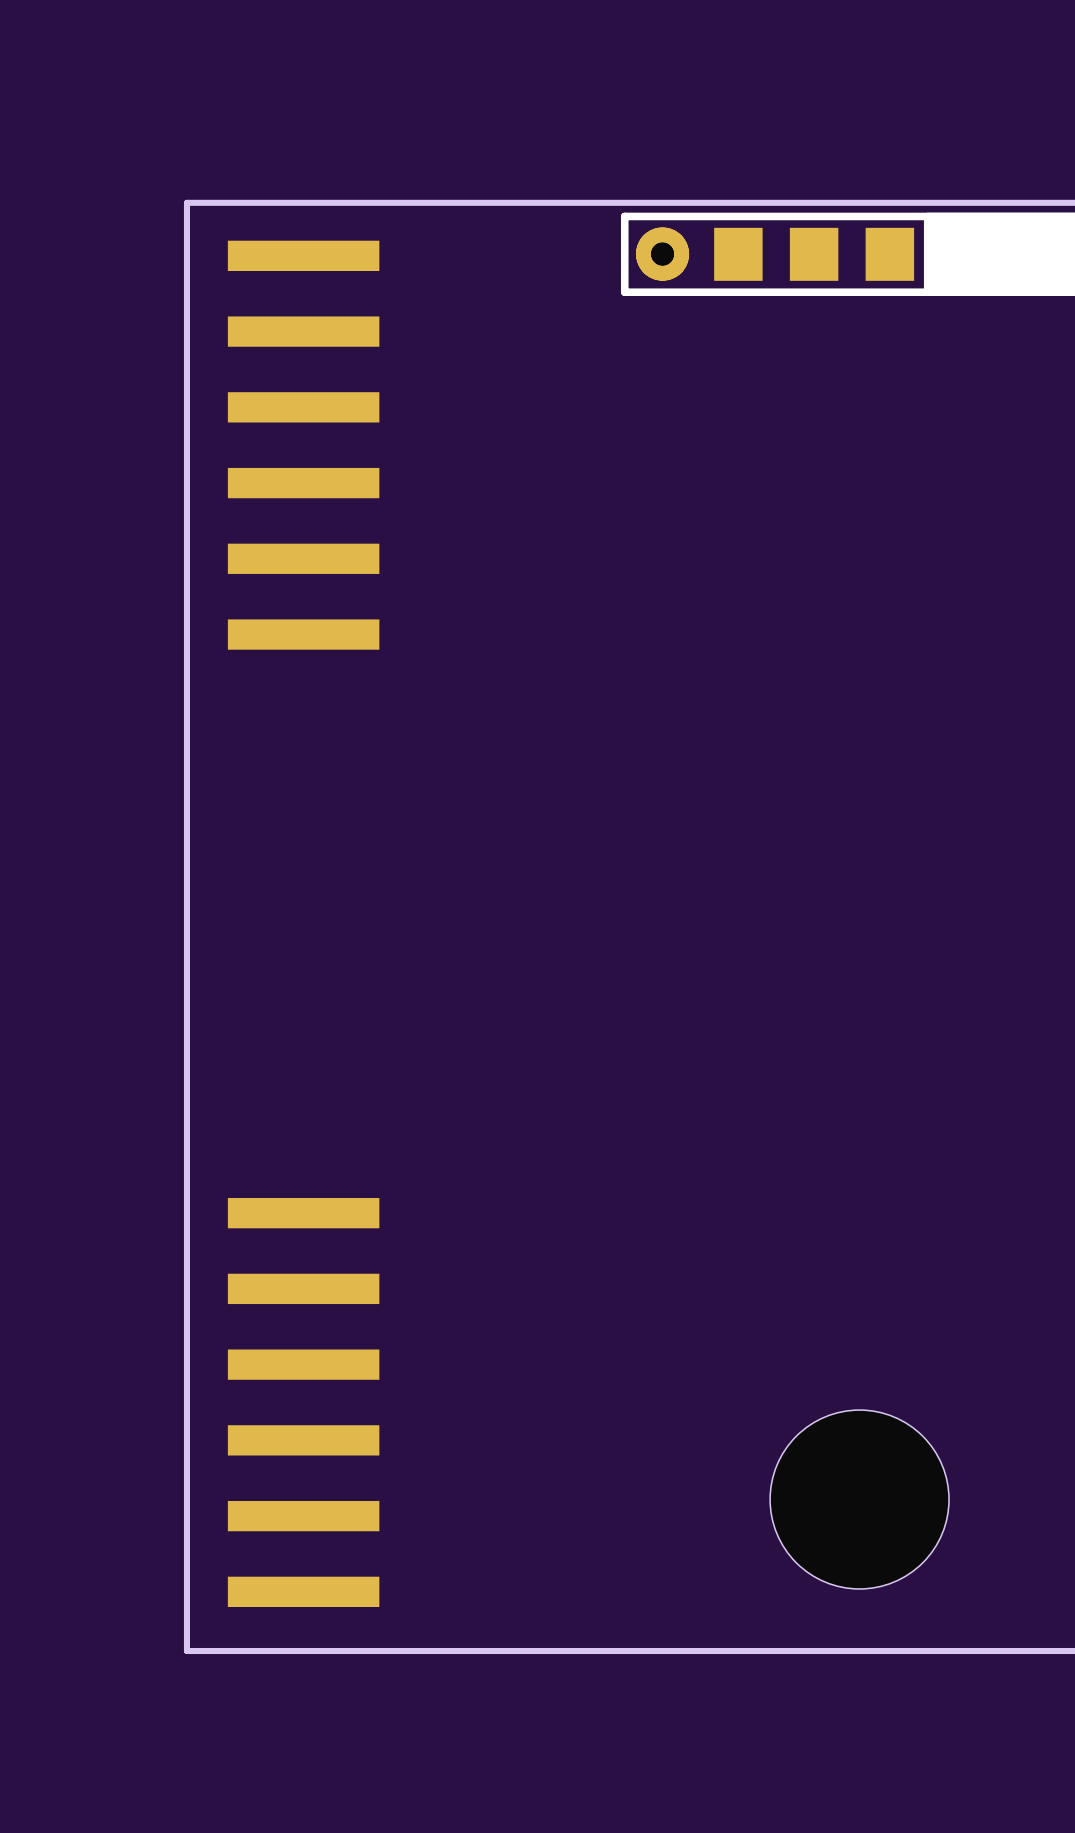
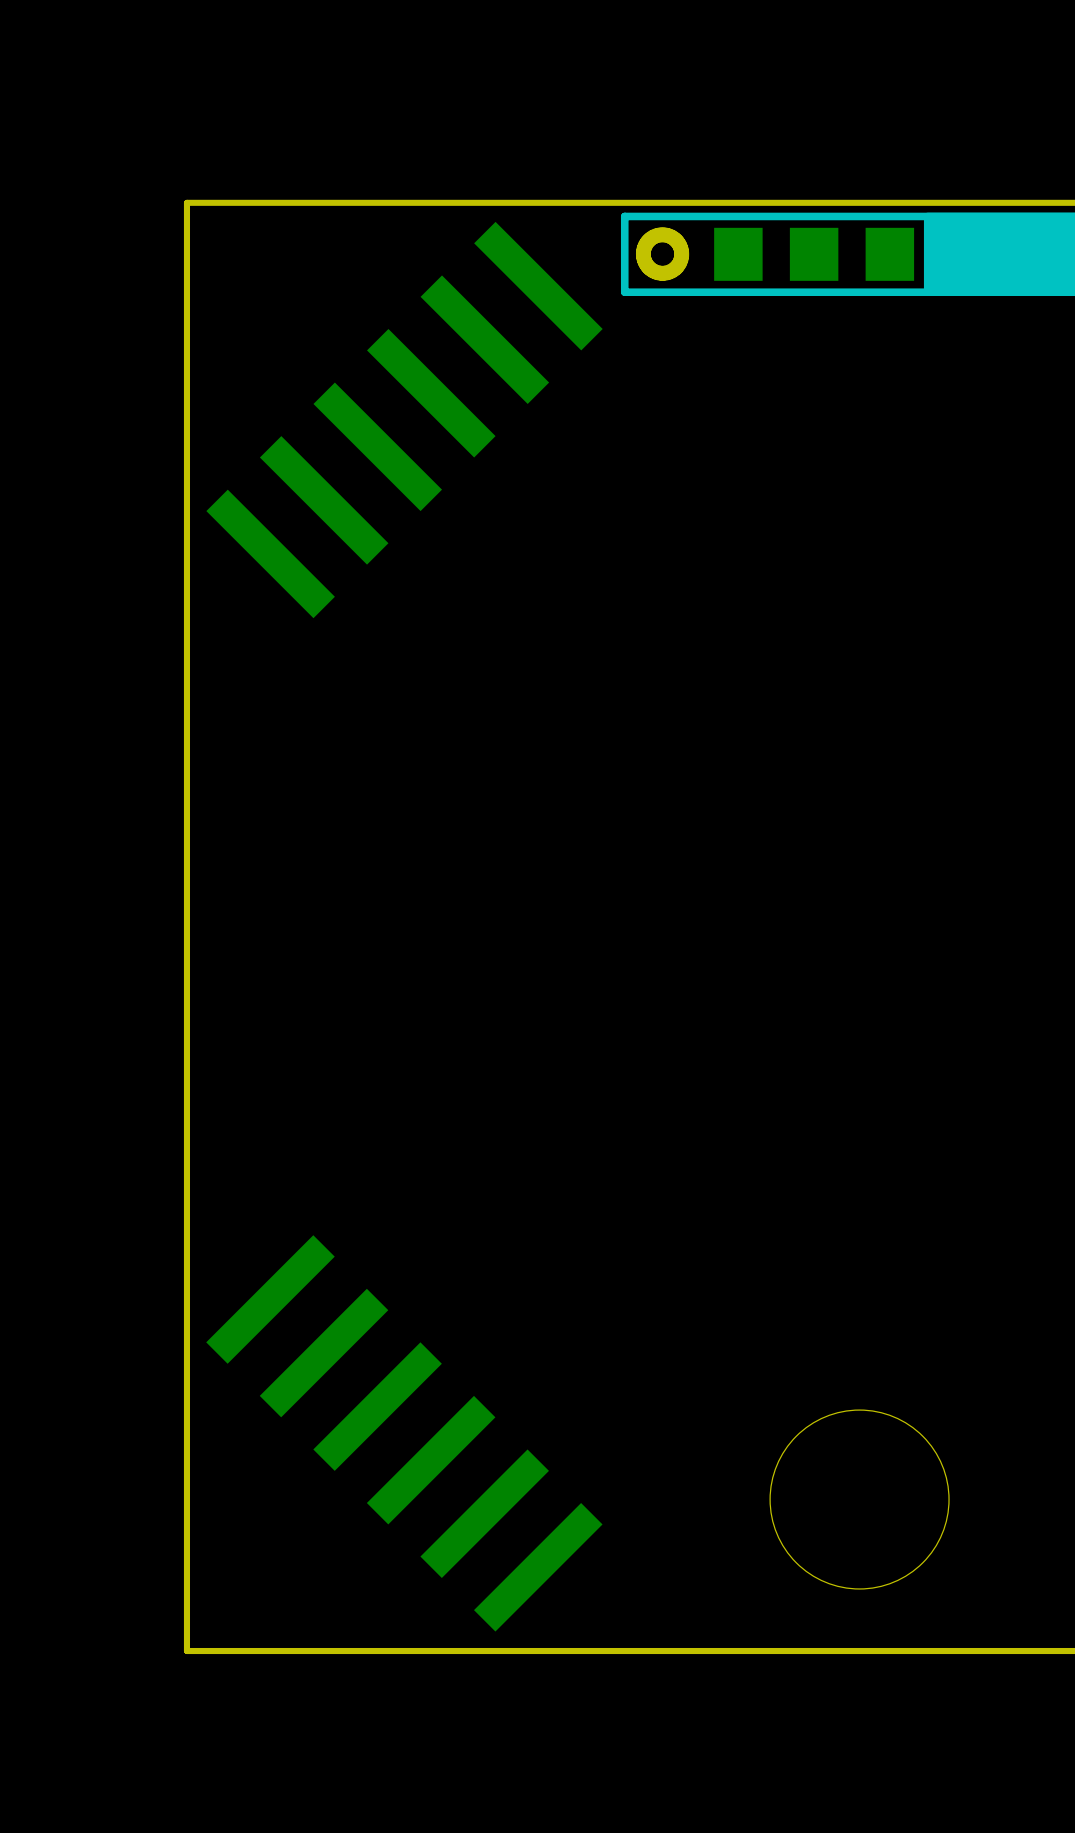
part: none -> (404, 420)
part: (303, 445) -> none
part: (303, 1402) -> none
part: none -> (404, 1433)

